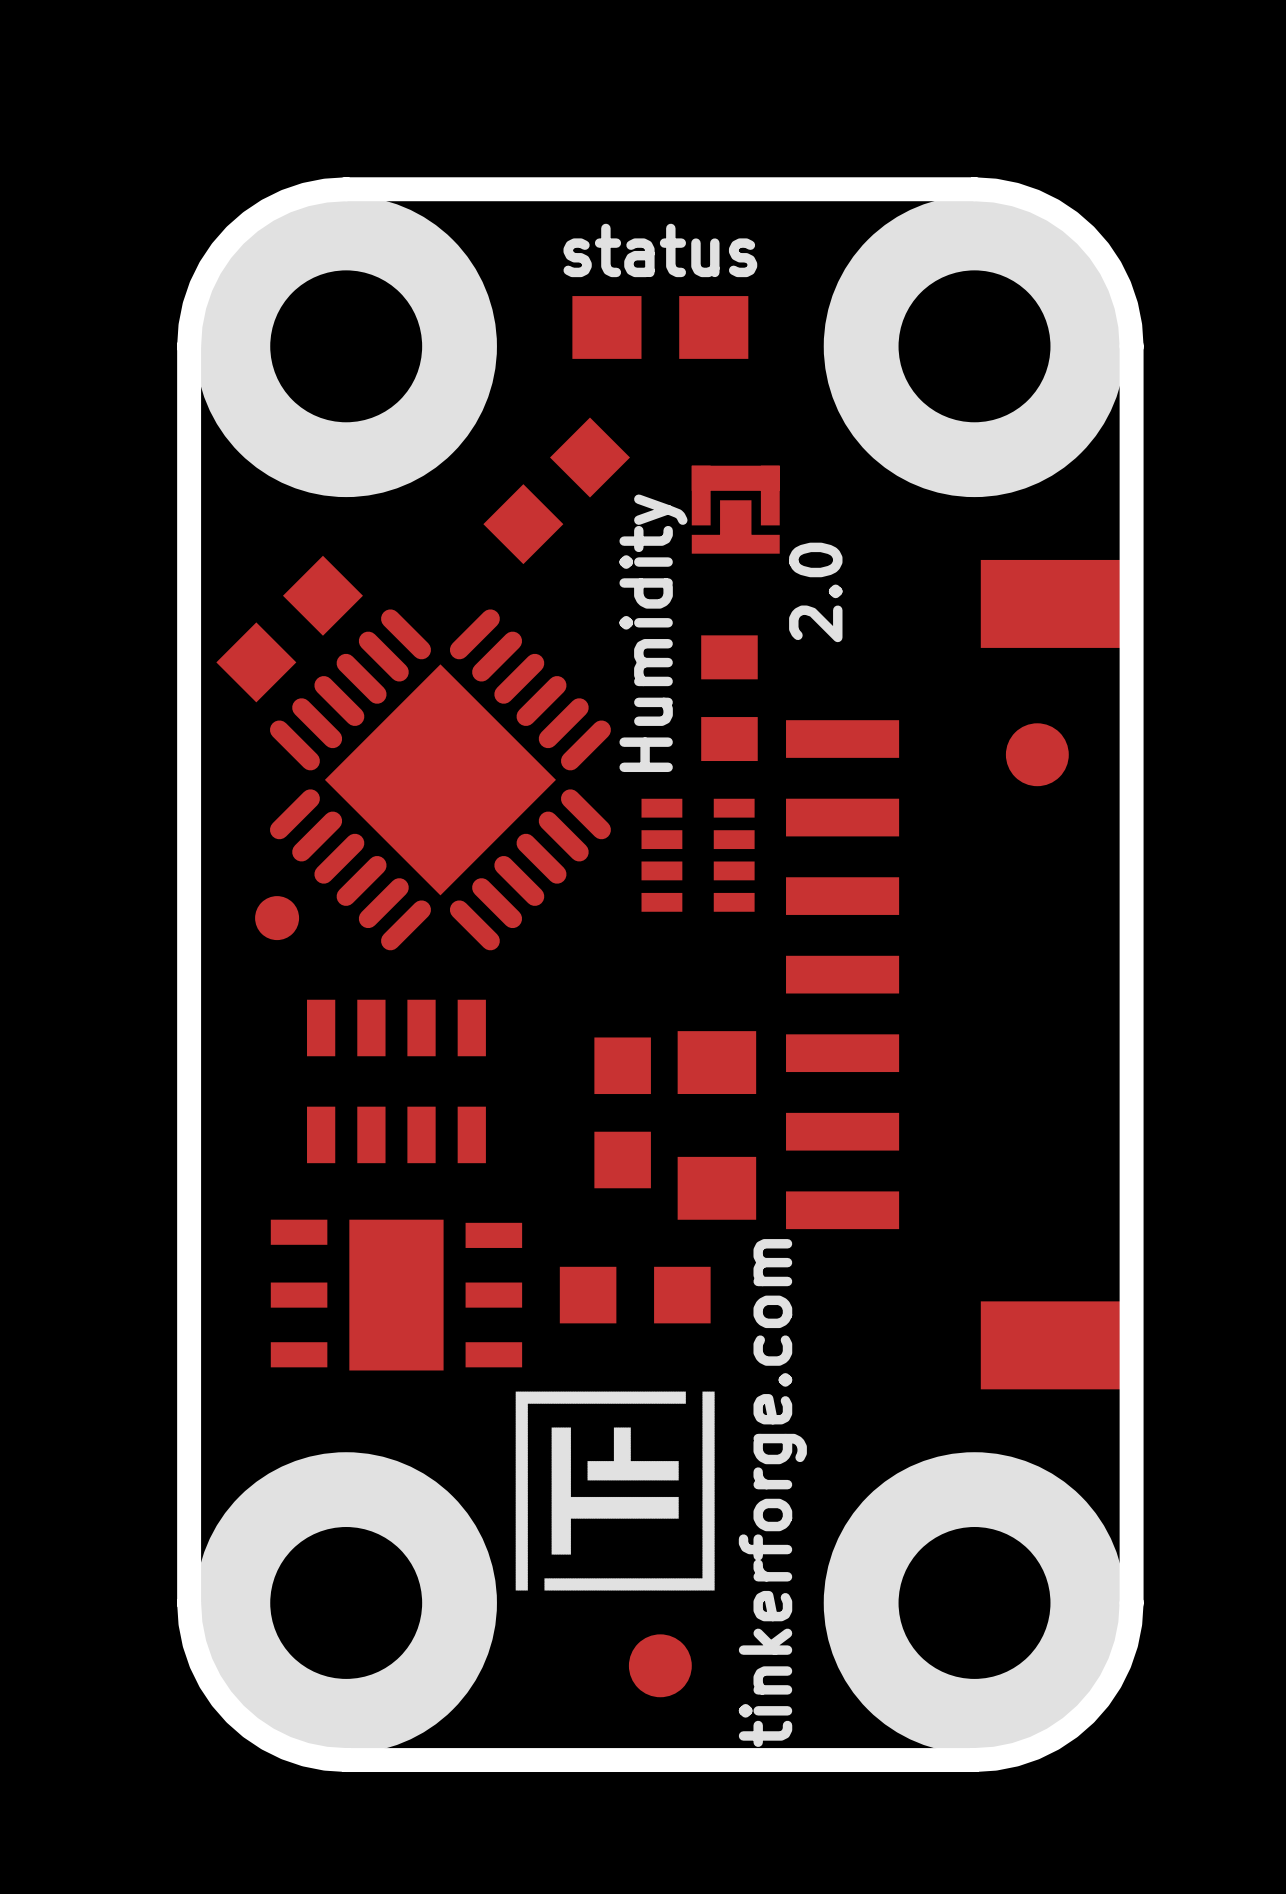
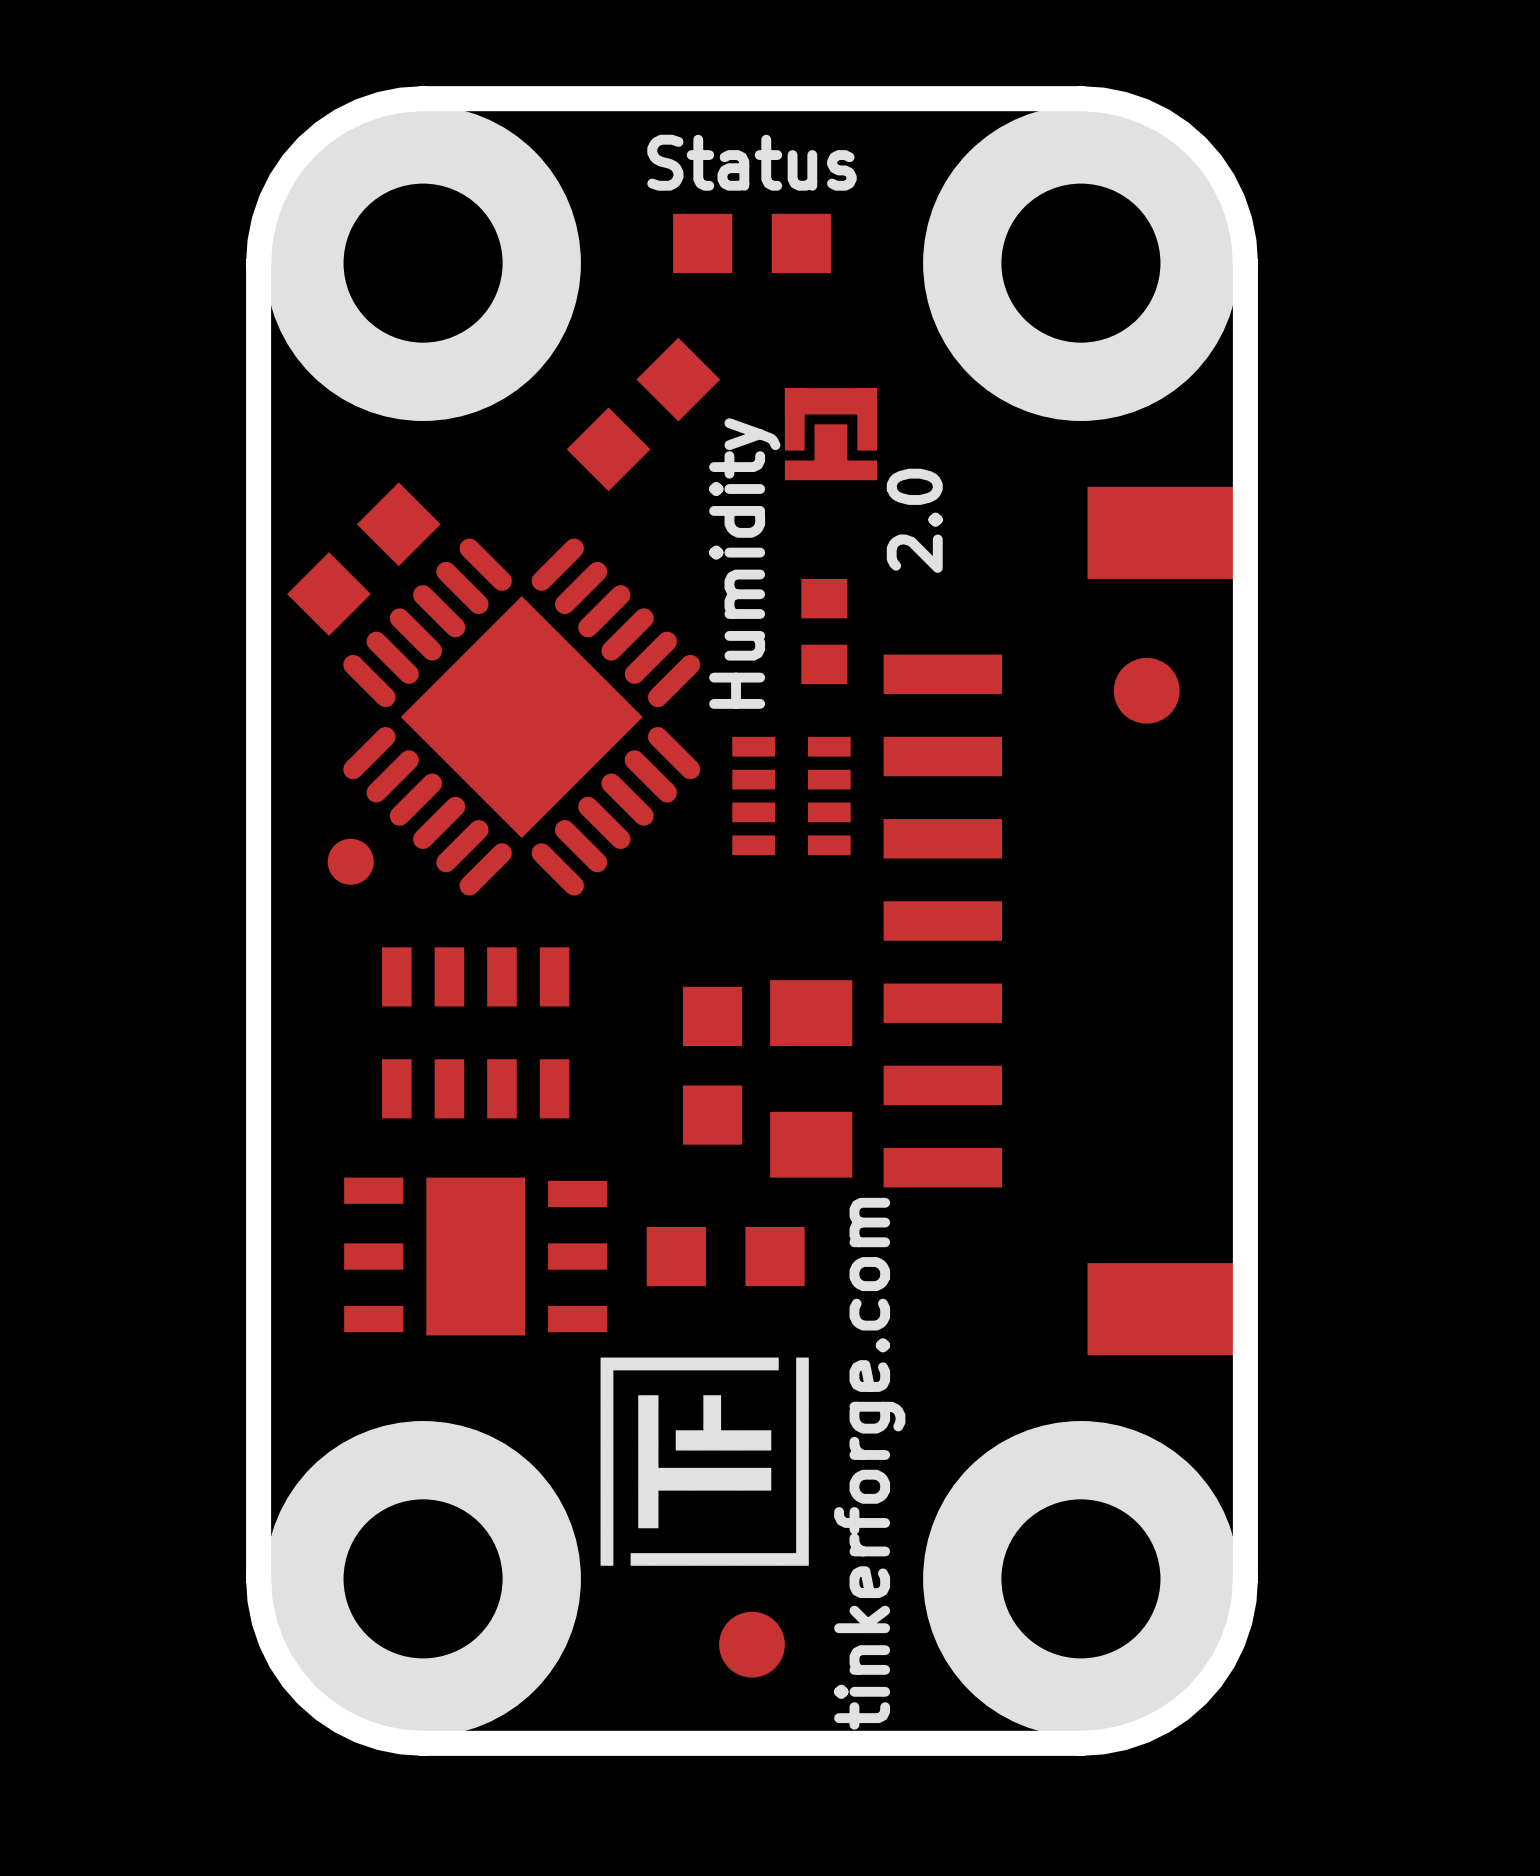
text: status (660, 250) -> Status (752, 162)
part footprint: [572, 296, 749, 359] -> [673, 213, 831, 274]
part footprint: [701, 635, 758, 762] -> [801, 578, 848, 685]

